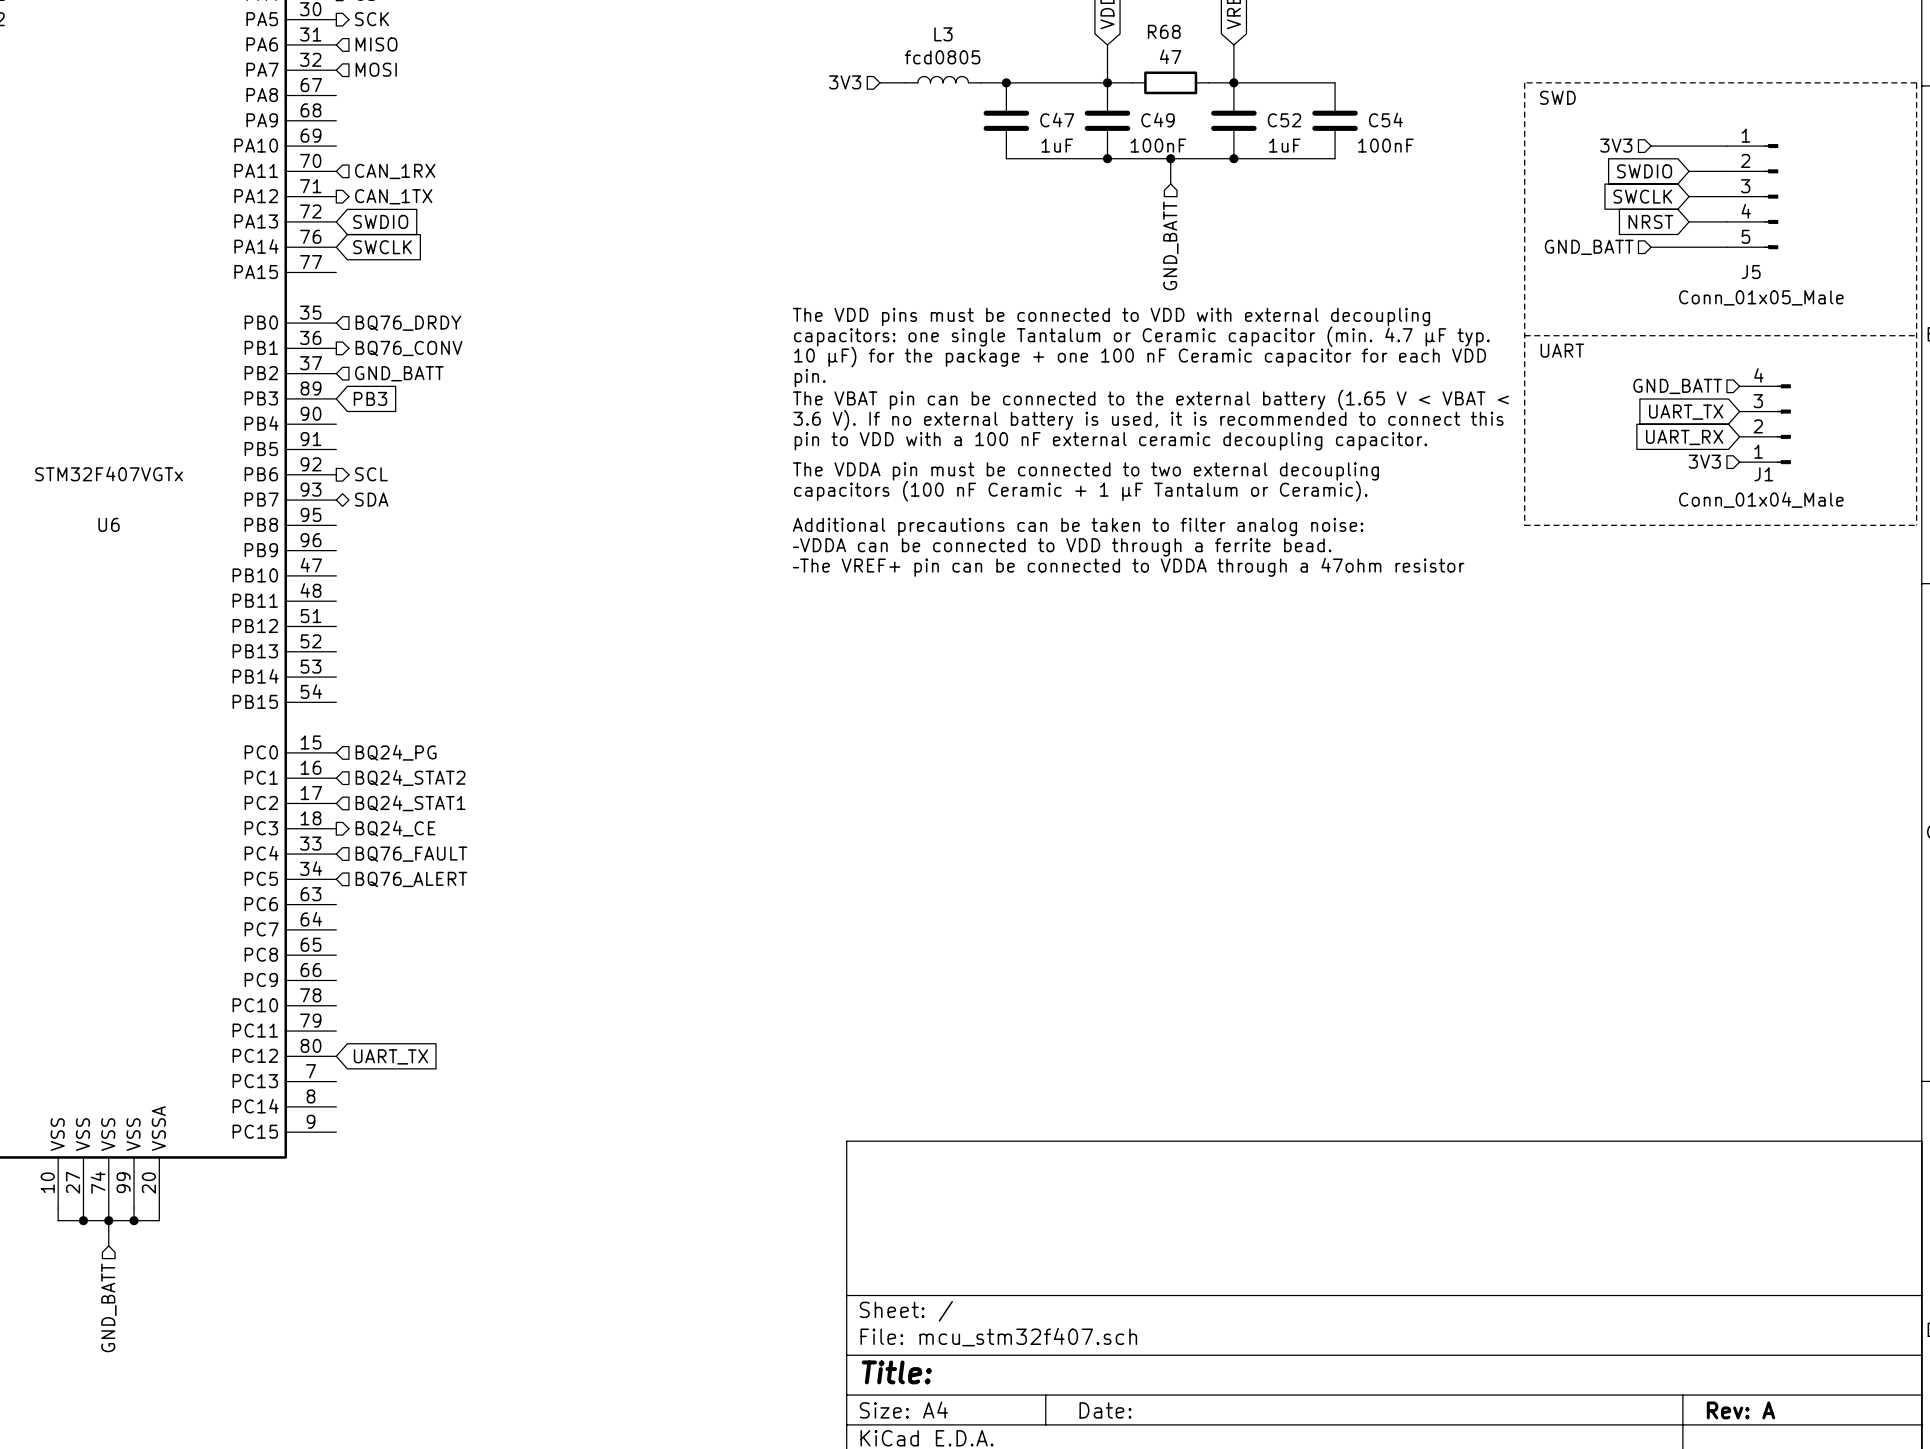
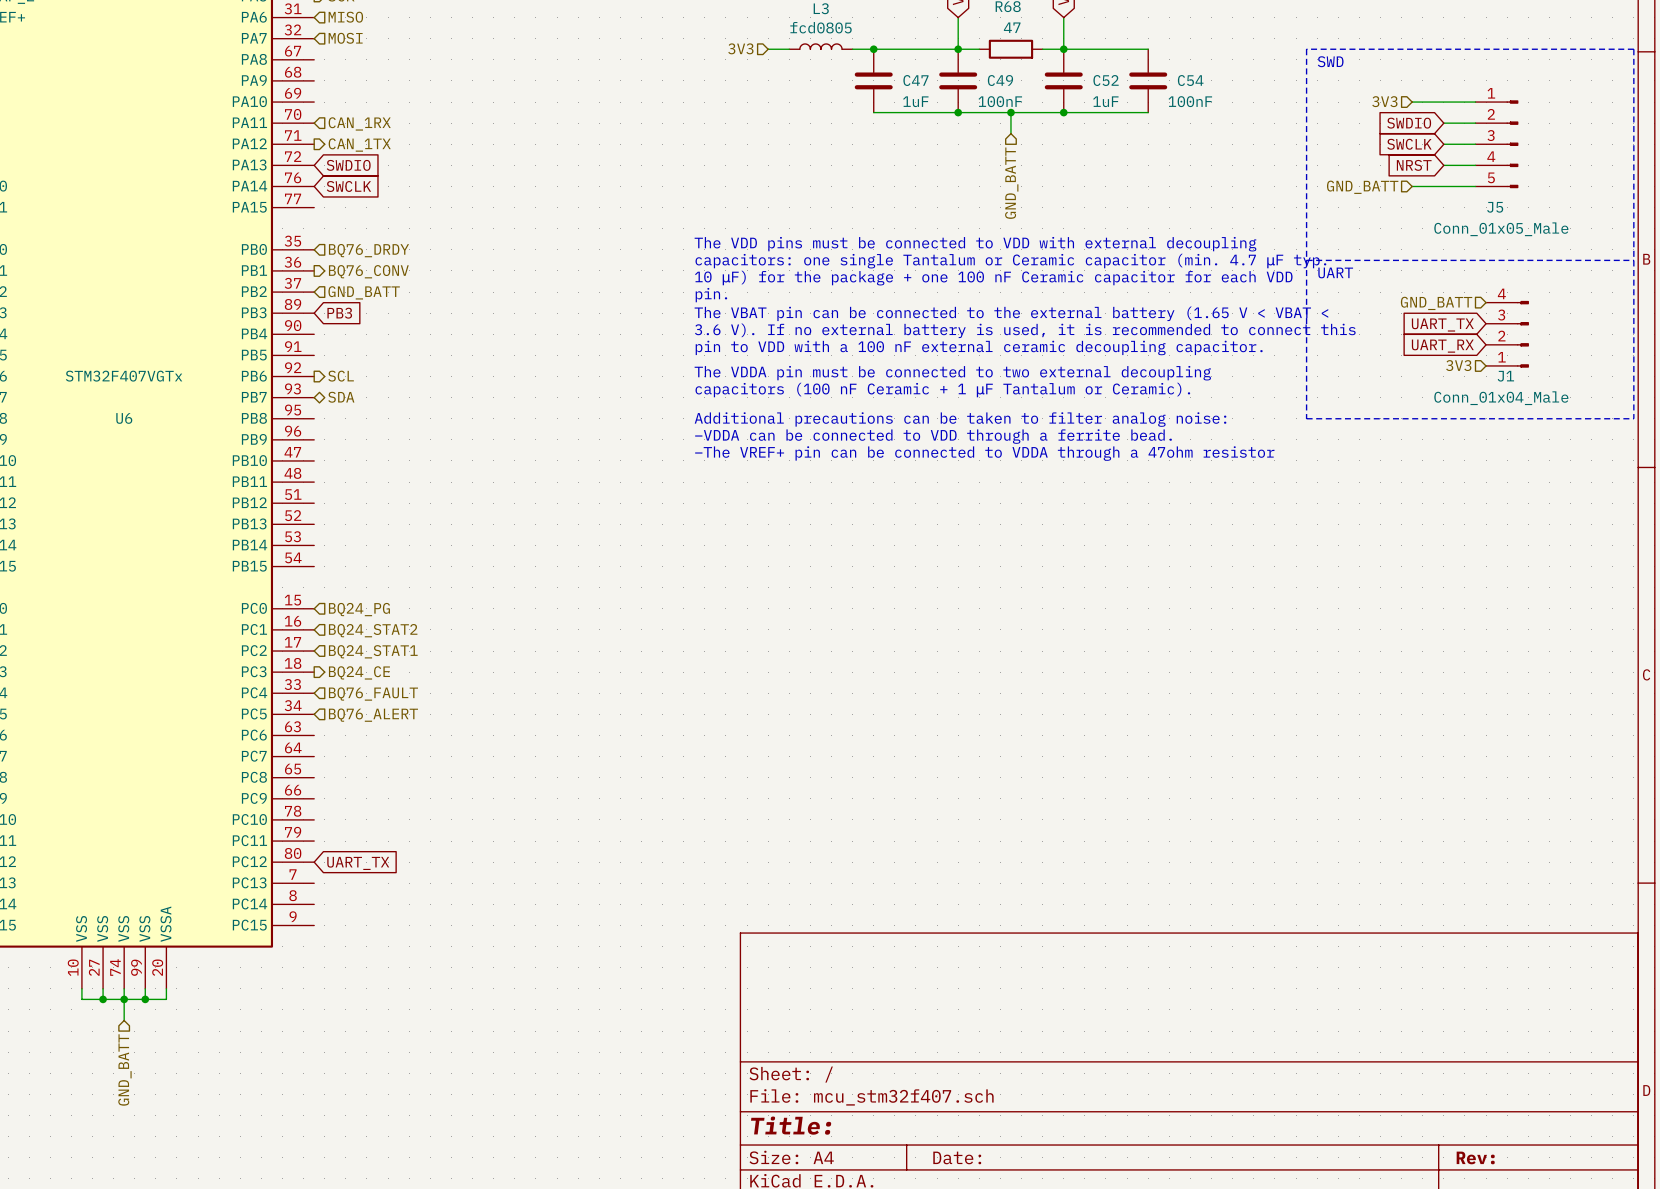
title block: Rev: A (1741, 1410) -> Rev: (1475, 1157)

